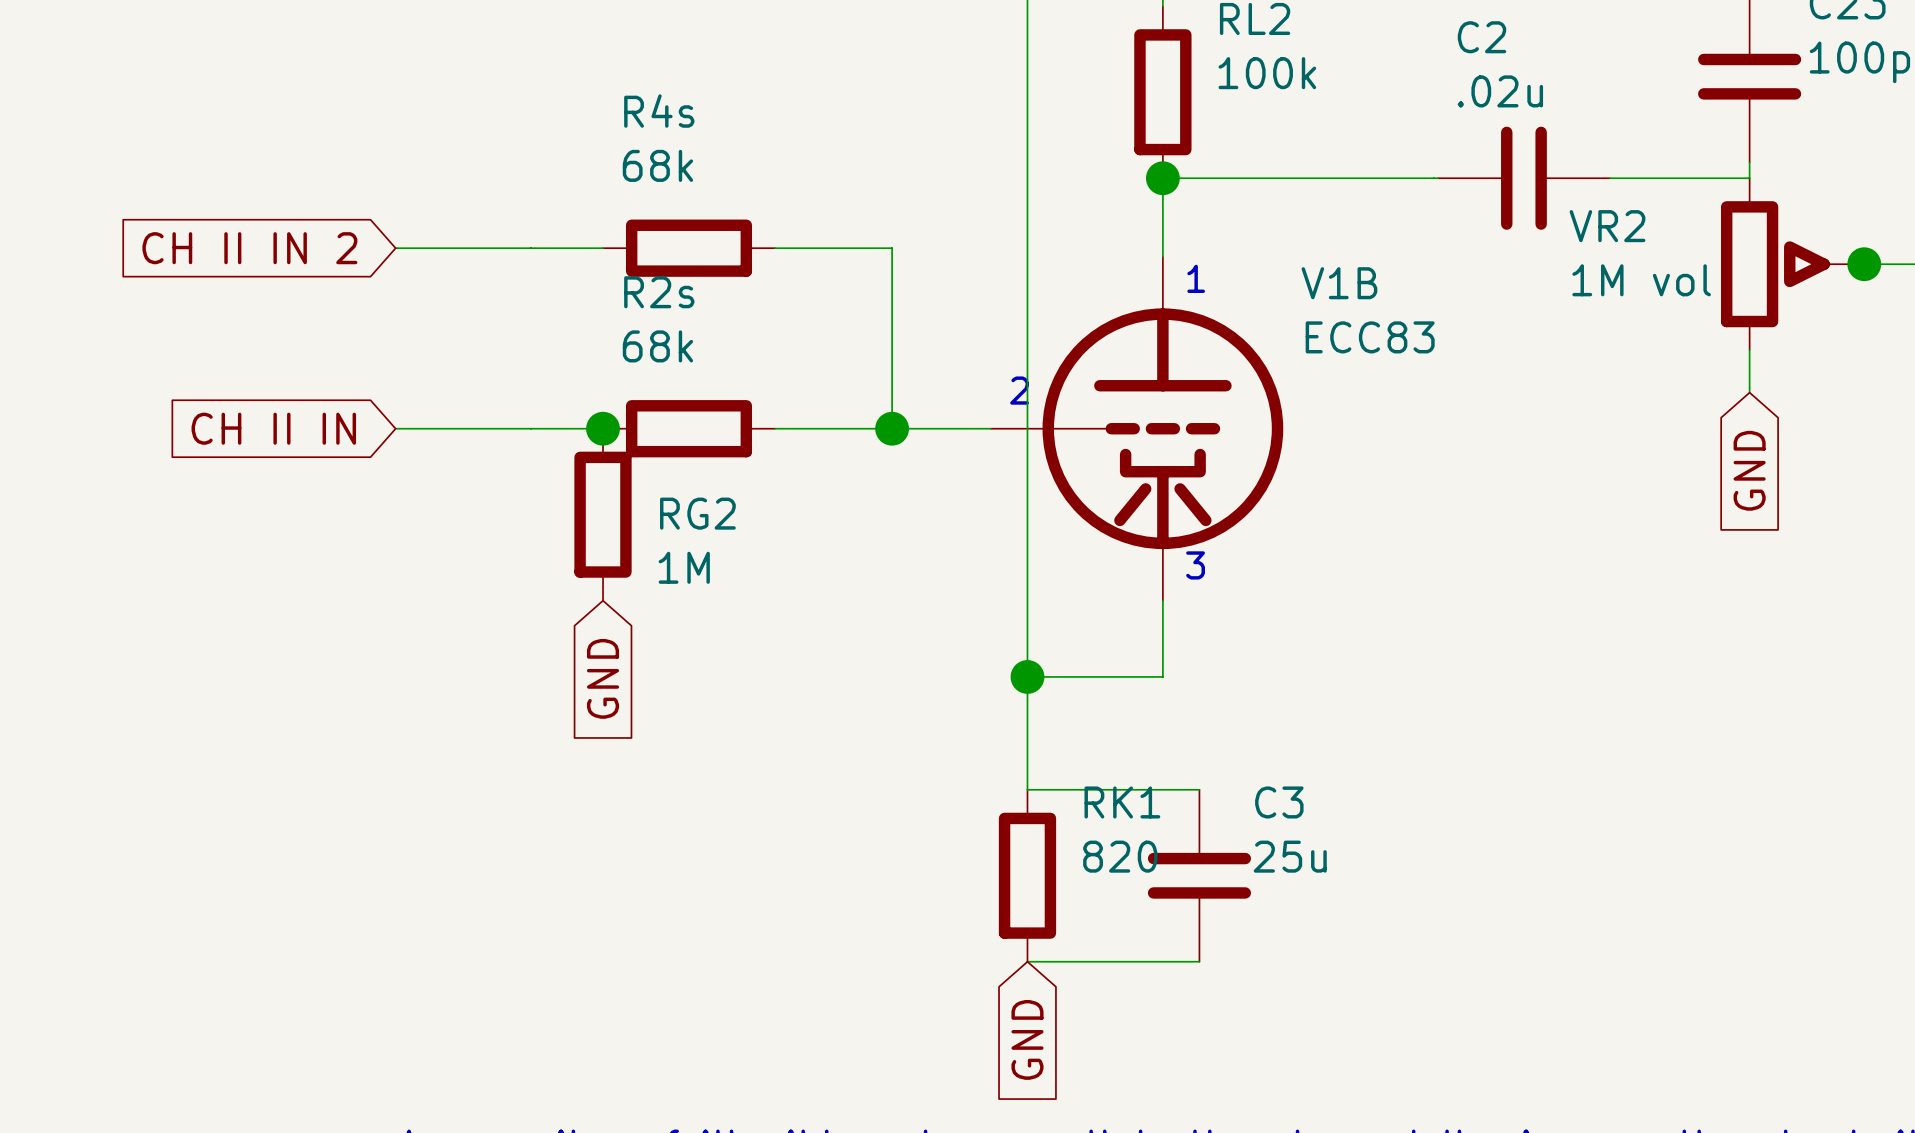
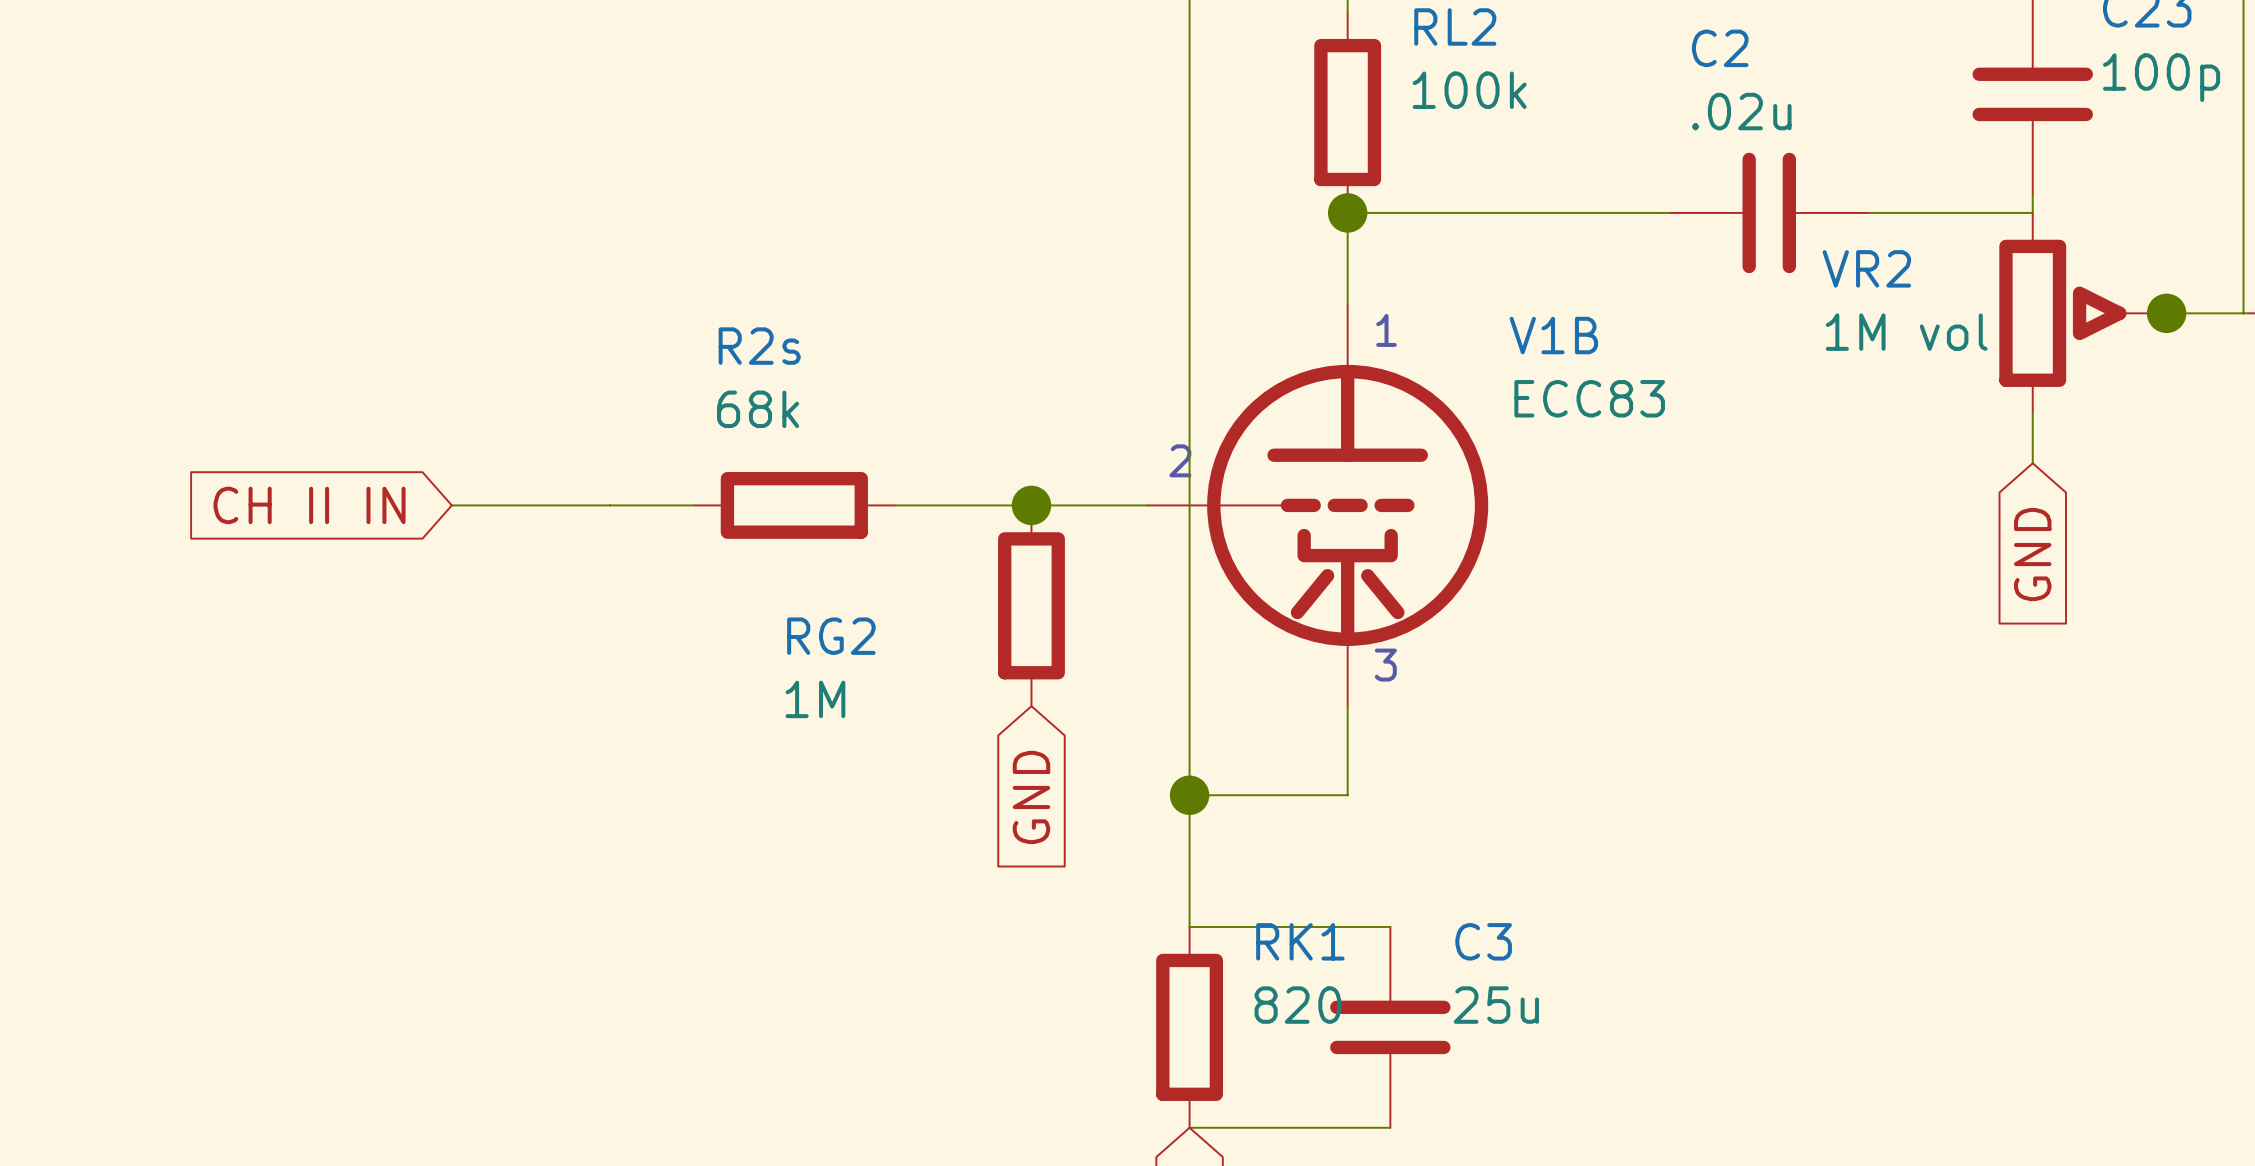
global label: CH II IN 2 (249, 248) -> none
wire: (395, 248) (603, 248) -> none
R4s: 68k (688, 248) -> none
wire: (774, 248) (892, 248) (892, 428) -> none
junction: (603, 428) -> none
RG2 name position: RG2 (697, 513) -> RG2 (831, 636)
RG2 position: (603, 514) -> (1031, 605)
RG2 value position: 1M (684, 567) -> 1M (815, 699)
global label position: GND (603, 678) -> GND (1031, 797)

